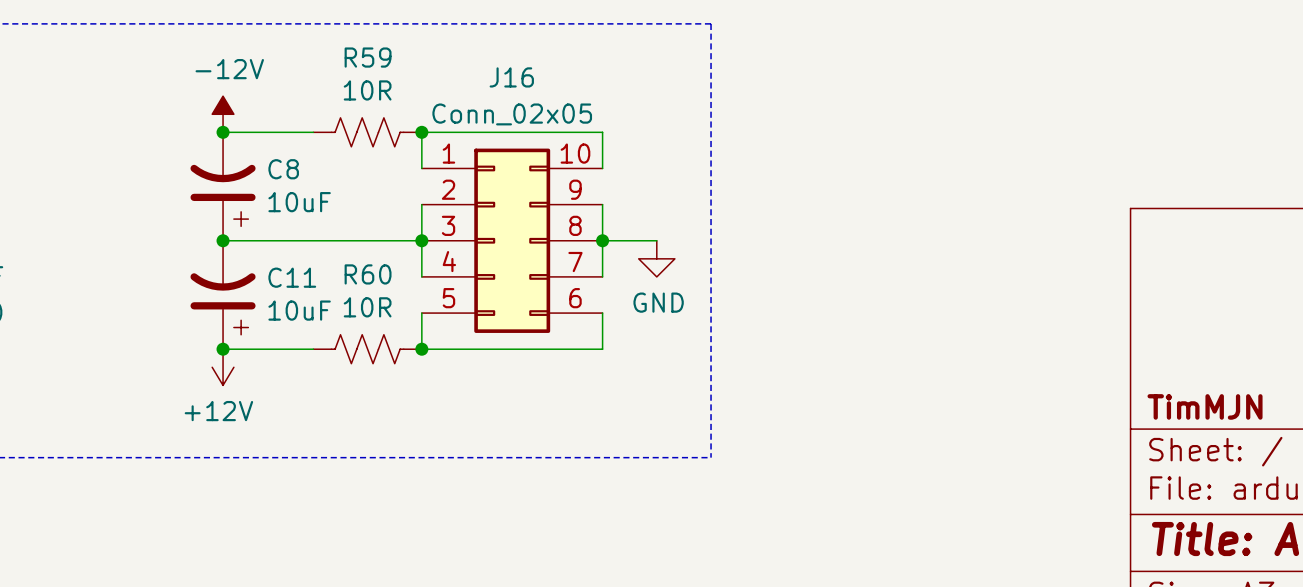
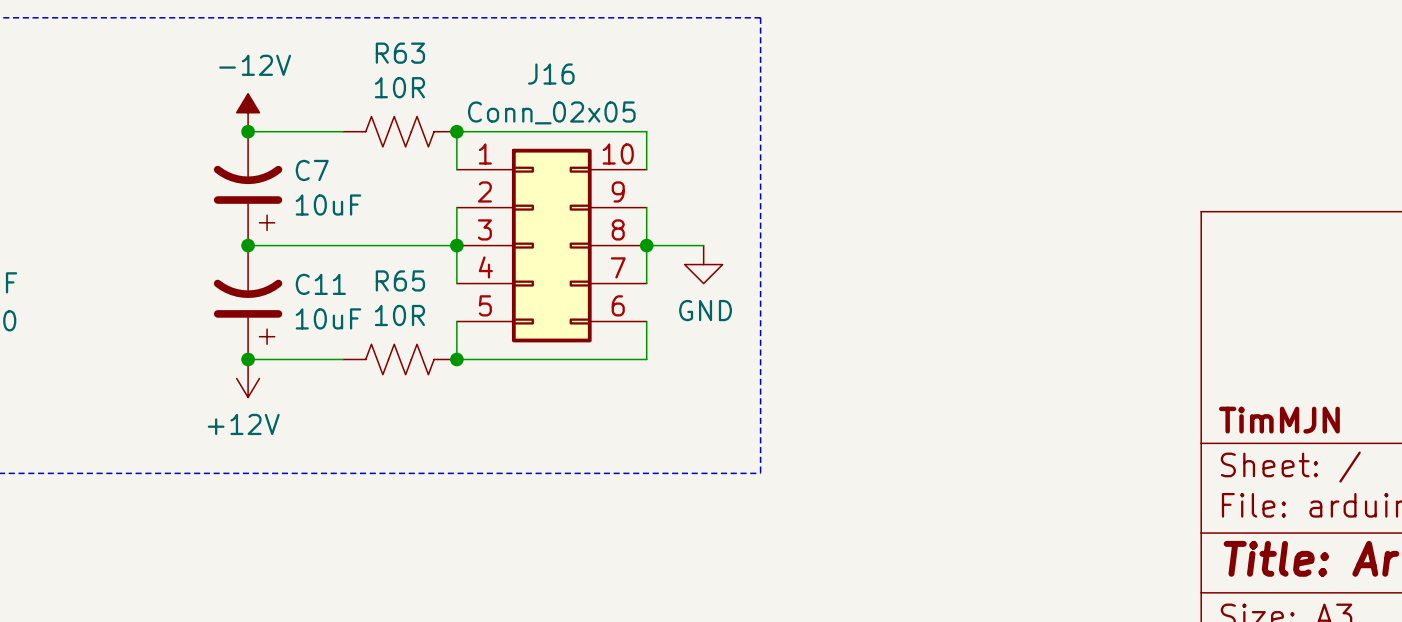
R59 name: R59 (368, 57) -> R63 (400, 53)
C8 name: C8 (283, 169) -> C7 (312, 170)
R60 name: R60 (368, 274) -> R65 (400, 280)

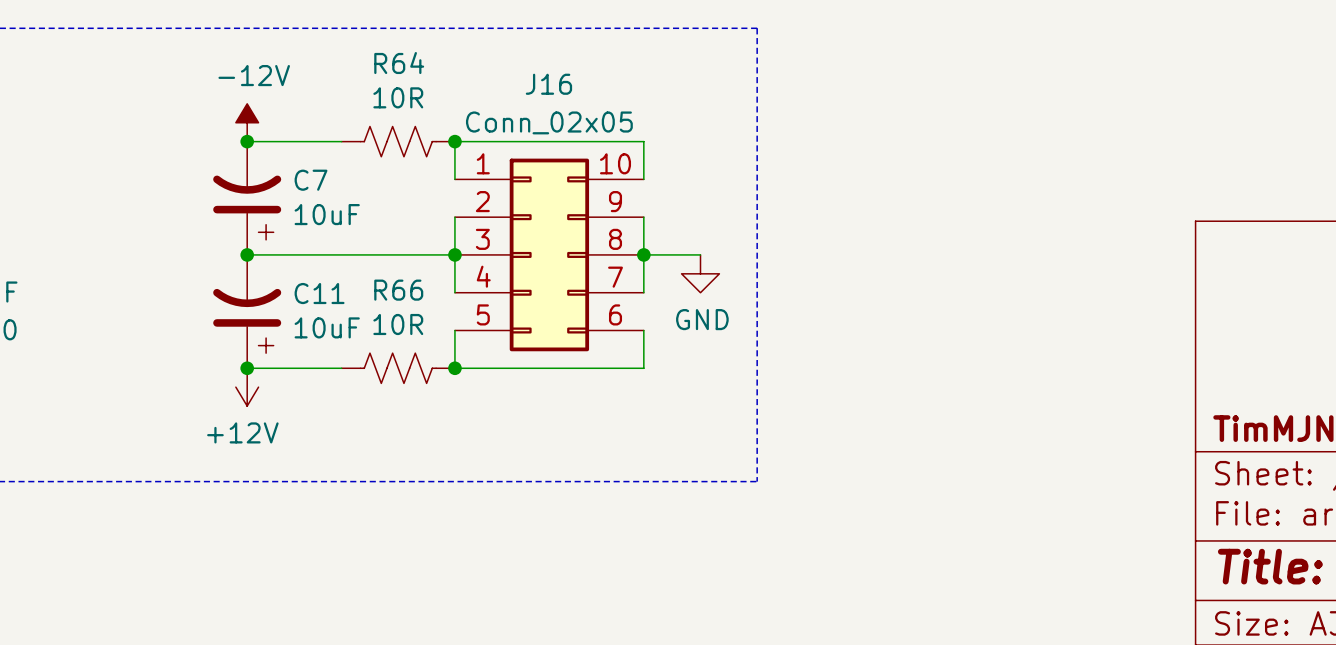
R63 name: R63 (400, 53) -> R64 (399, 63)
R65 name: R65 (400, 280) -> R66 (398, 290)

